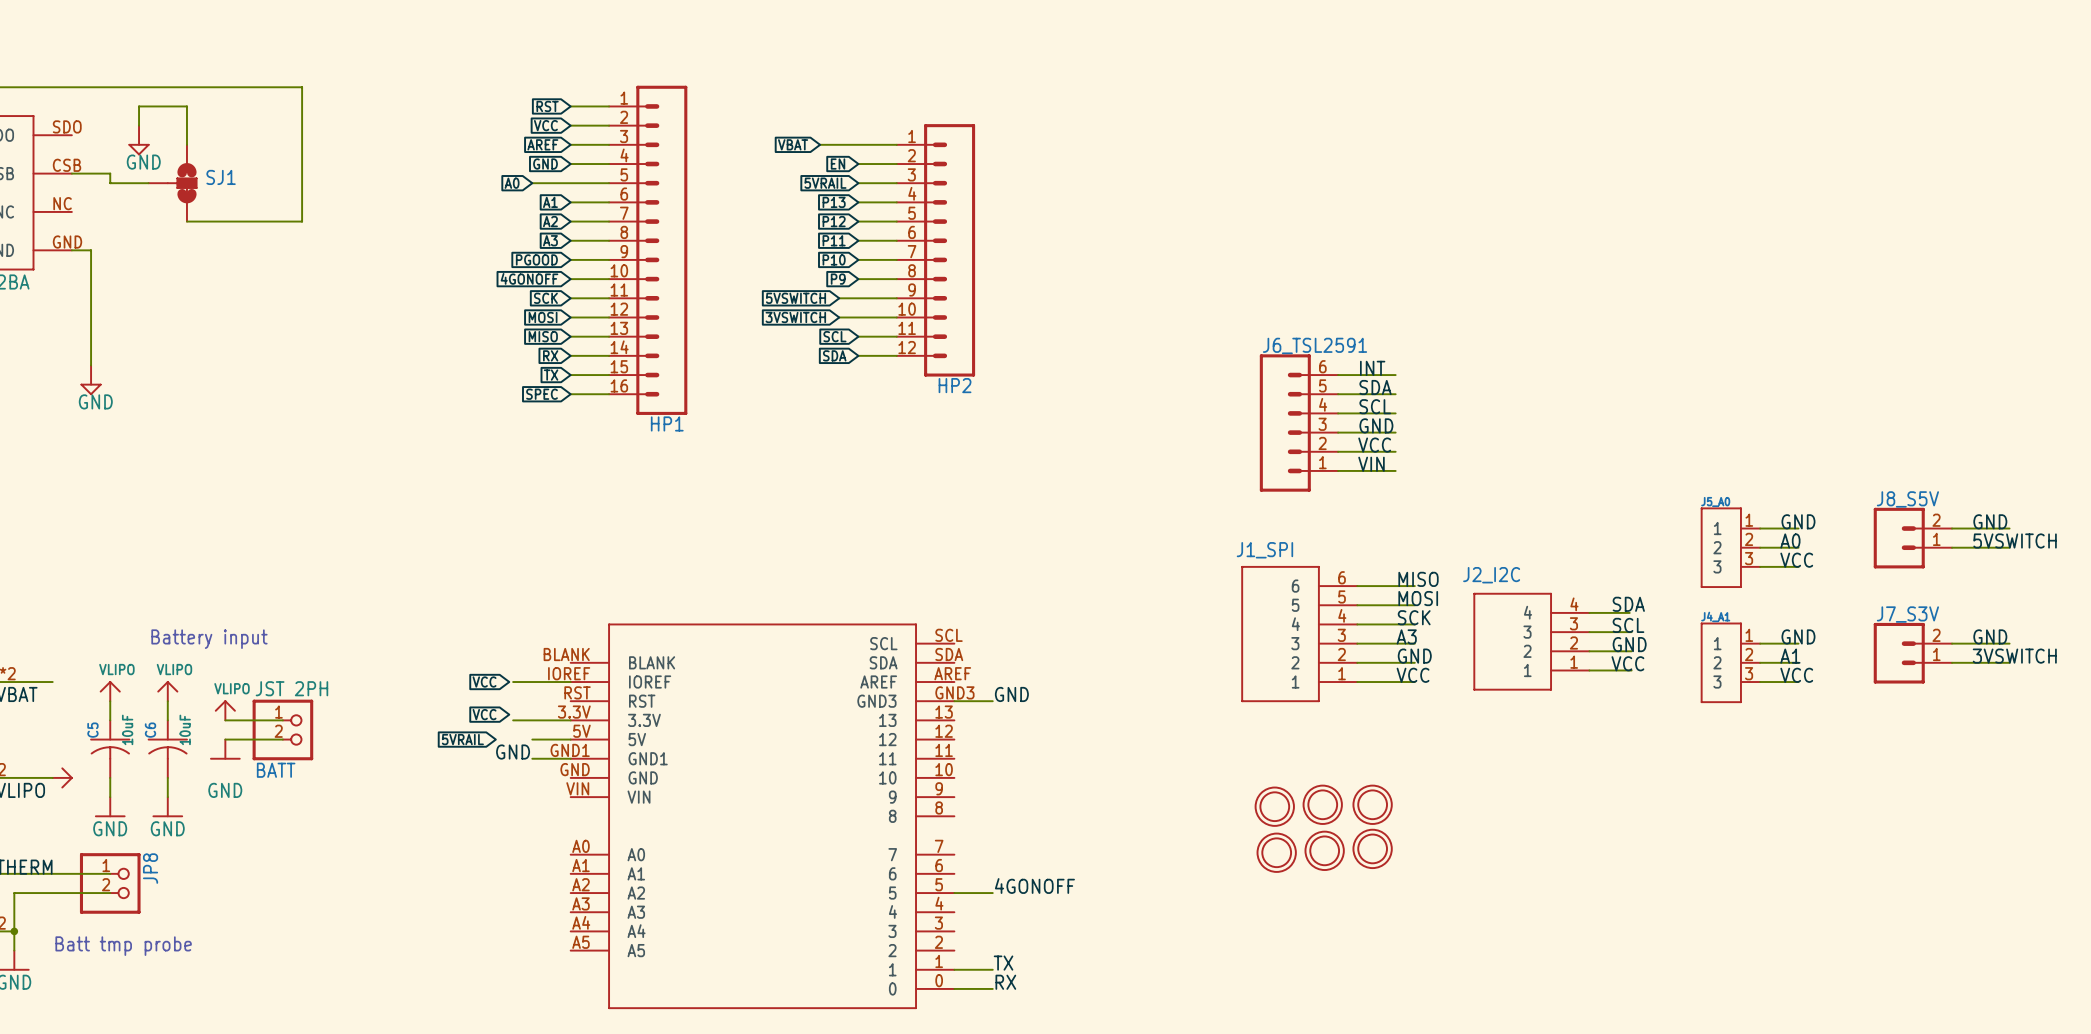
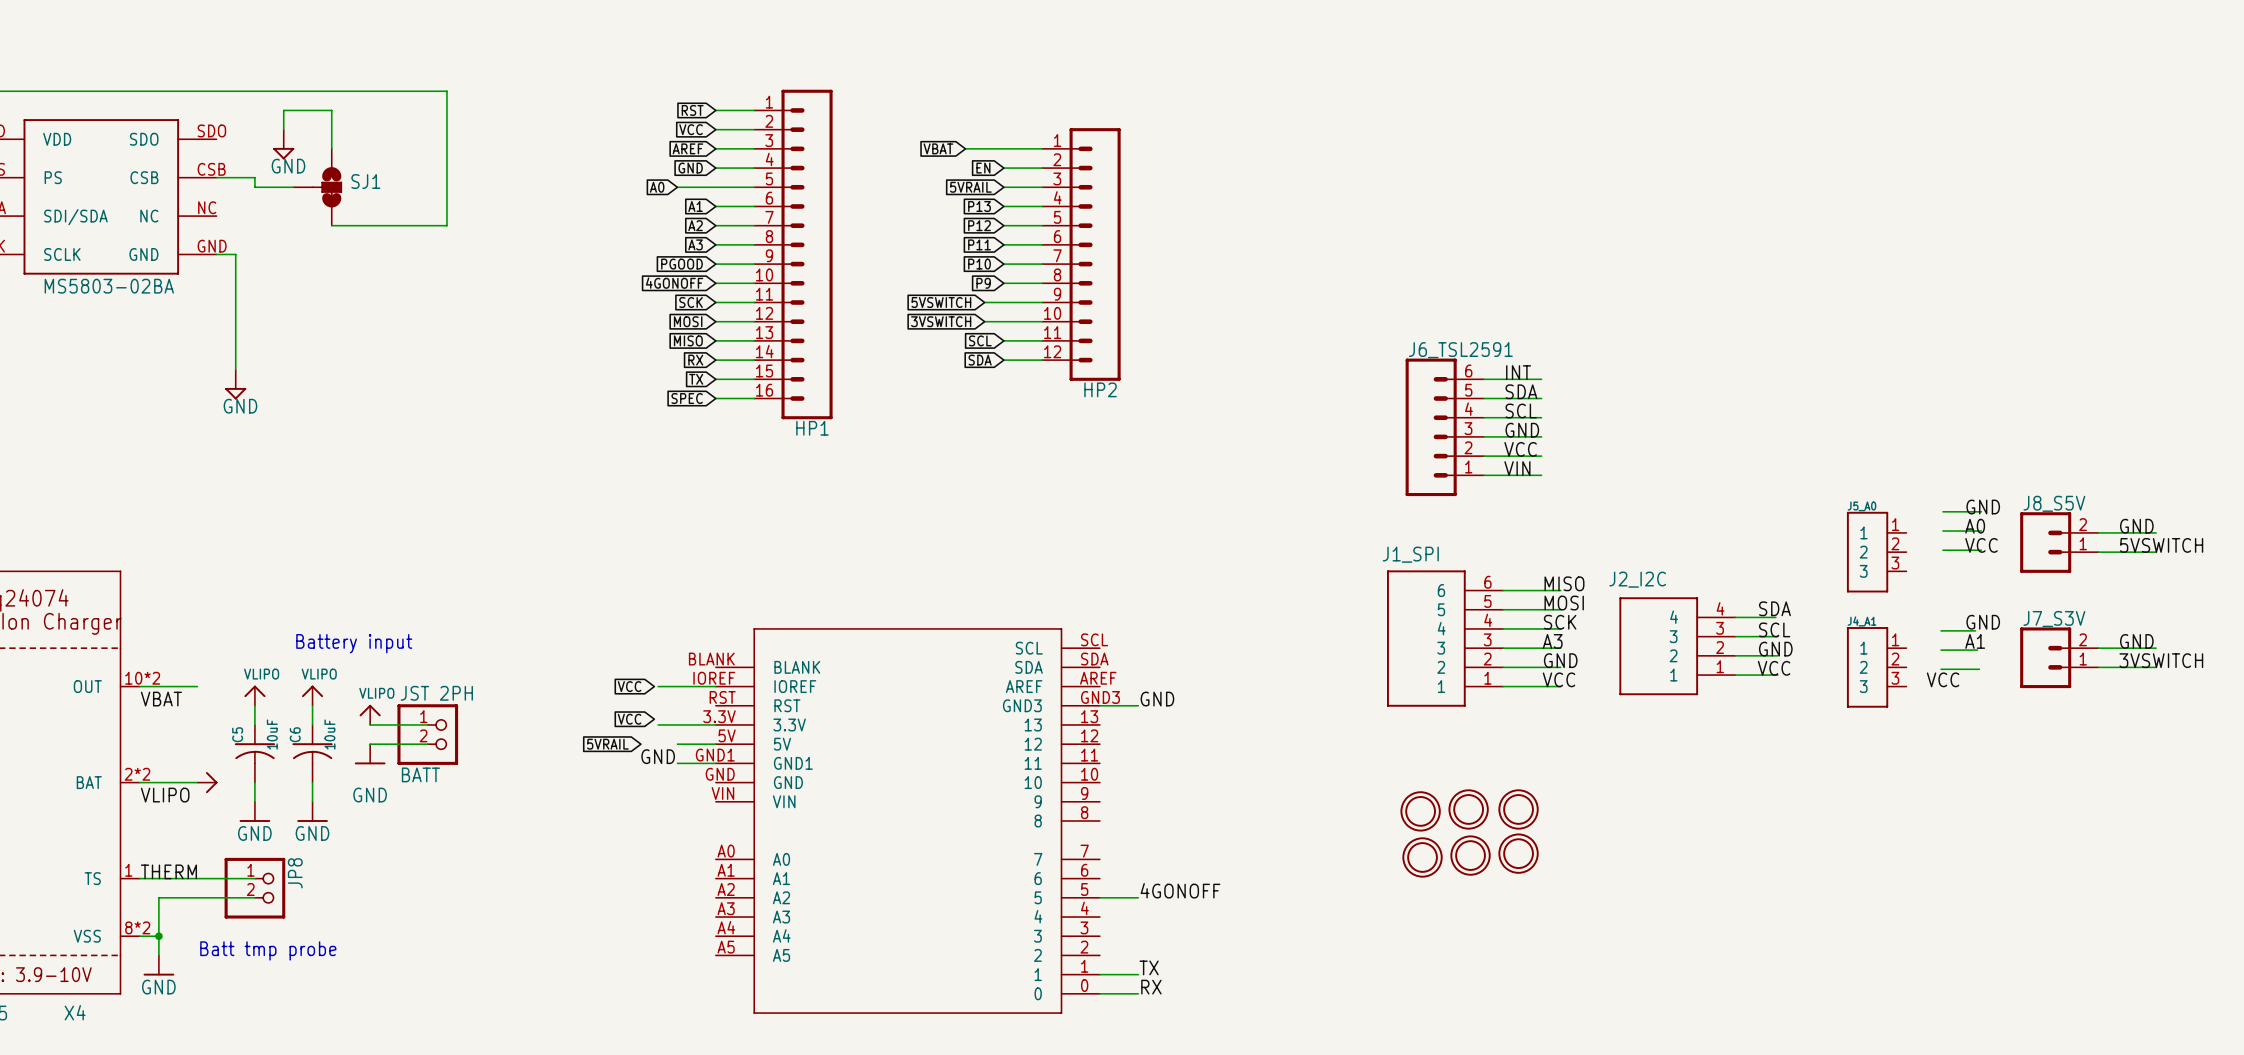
label position: GND (1798, 521) -> GND (1983, 507)
wire: (1760, 528) (1798, 528) -> (1942, 511) (1981, 511)
label position: A0 (1790, 540) -> A0 (1975, 526)
wire: (1760, 547) (1798, 547) -> (1942, 531) (1981, 531)
label position: VCC (1796, 560) -> VCC (1981, 545)
wire: (1760, 566) (1798, 566) -> (1942, 550) (1981, 550)
wire: none -> (1941, 630) (1975, 630)
label position: GND (1798, 636) -> GND (1983, 622)
wire: (1760, 643) (1798, 643) -> none
wire: none -> (1941, 650) (1977, 650)
label position: A1 (1790, 656) -> A1 (1975, 641)
wire: (1760, 662) (1798, 662) -> (1941, 669) (1979, 669)
wire: (1760, 682) (1798, 682) -> none

